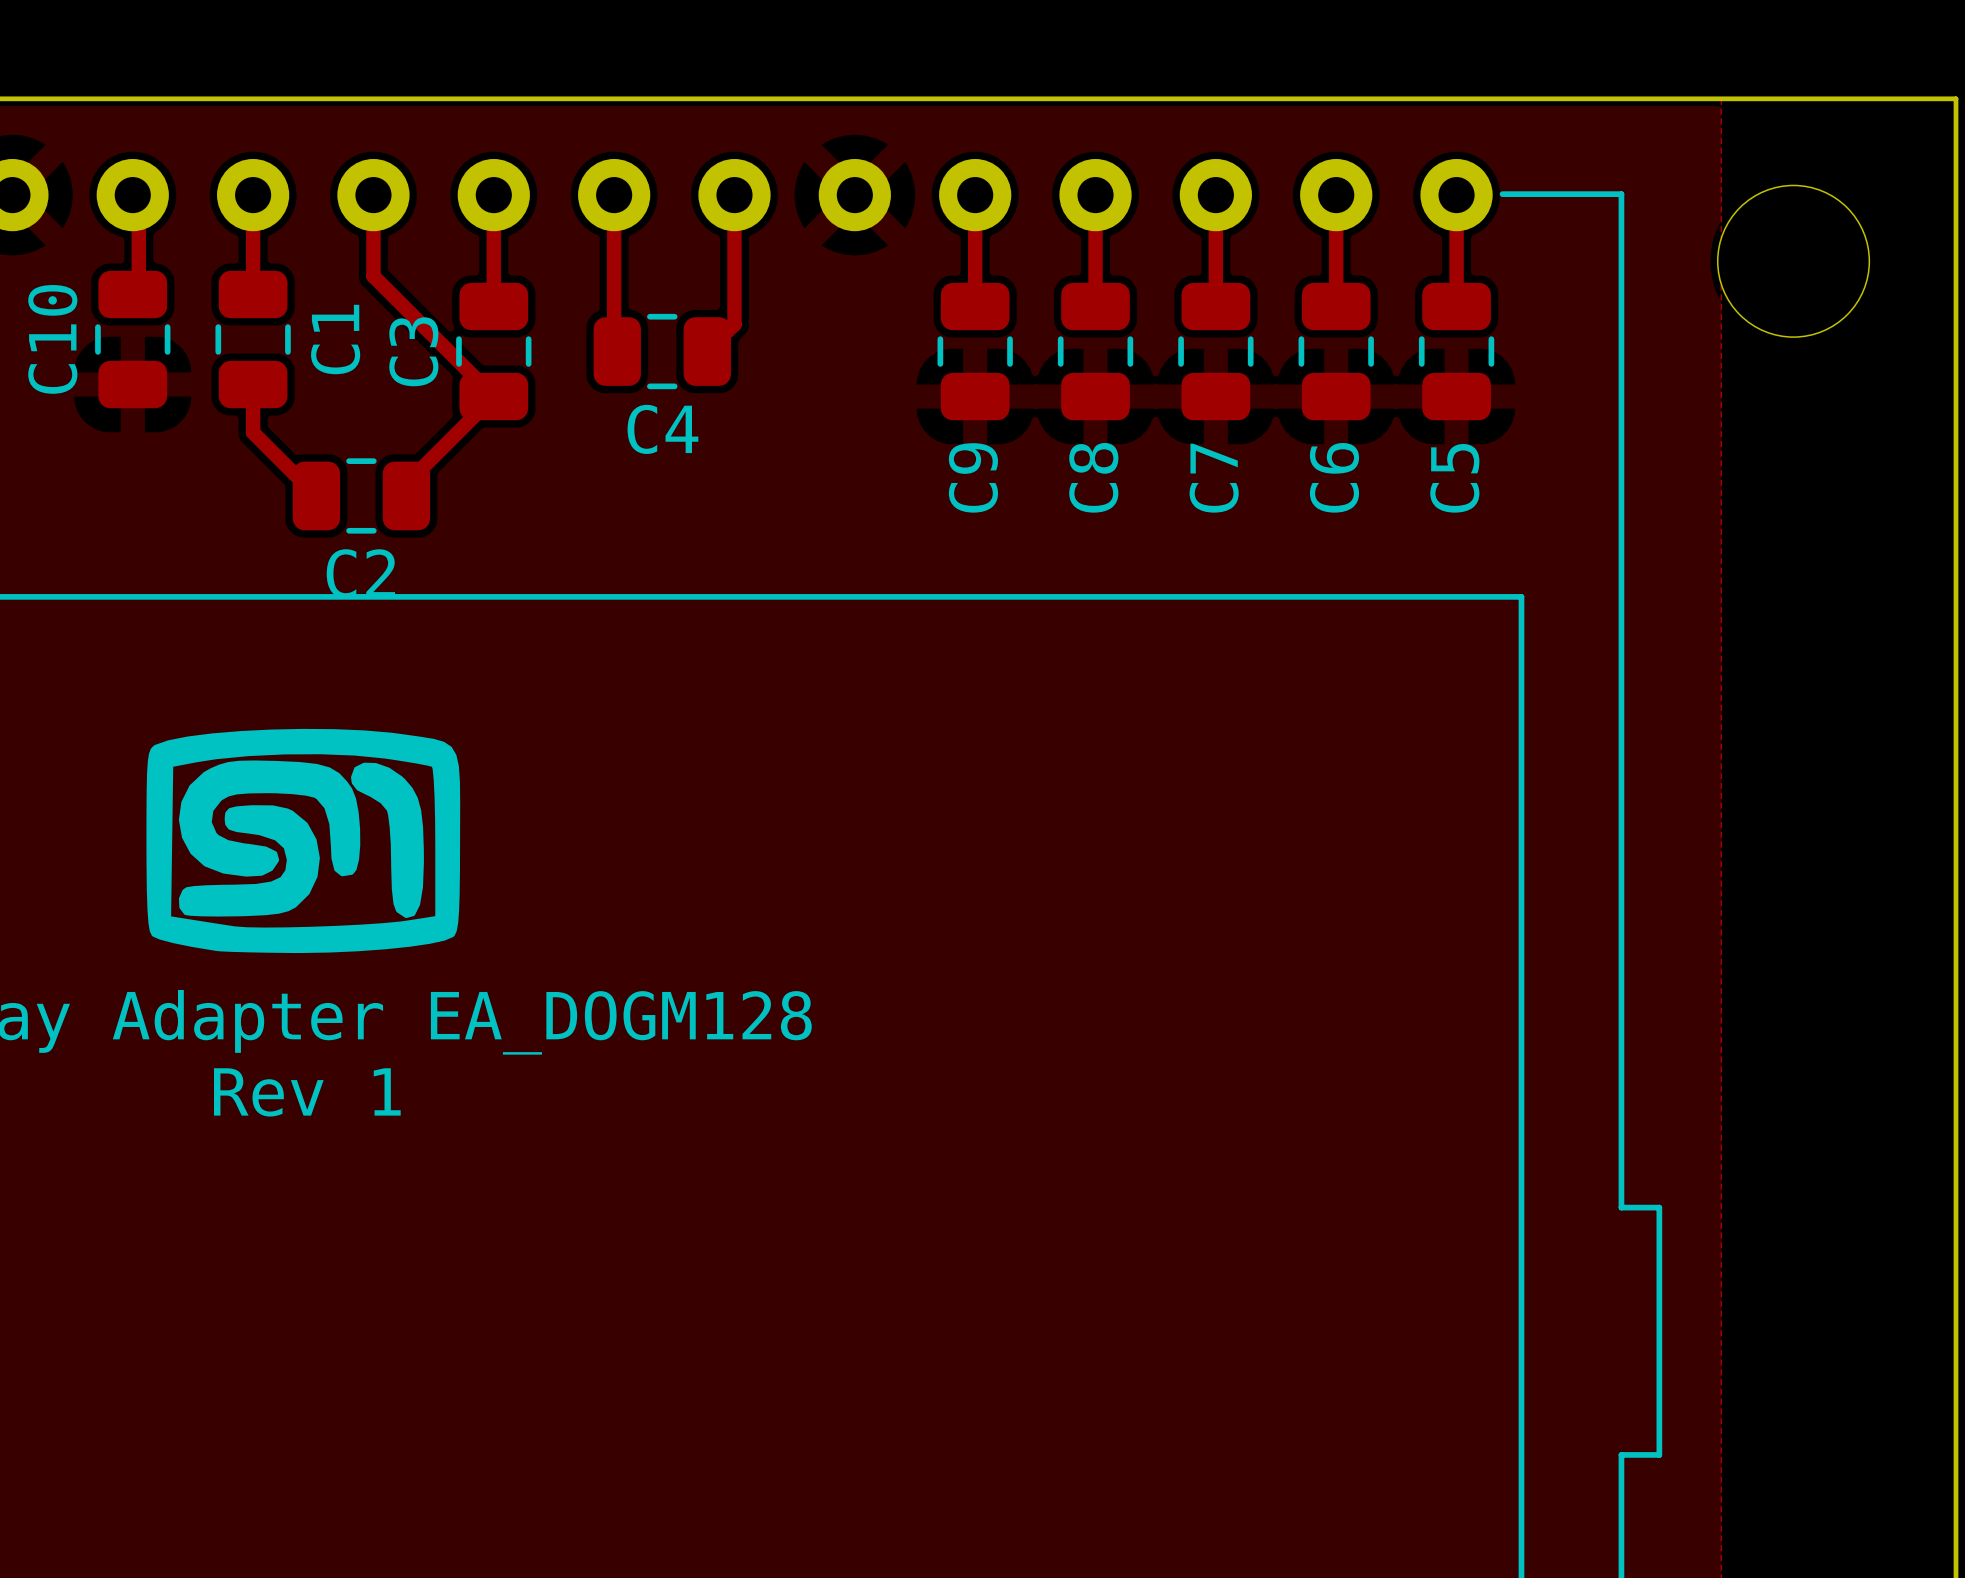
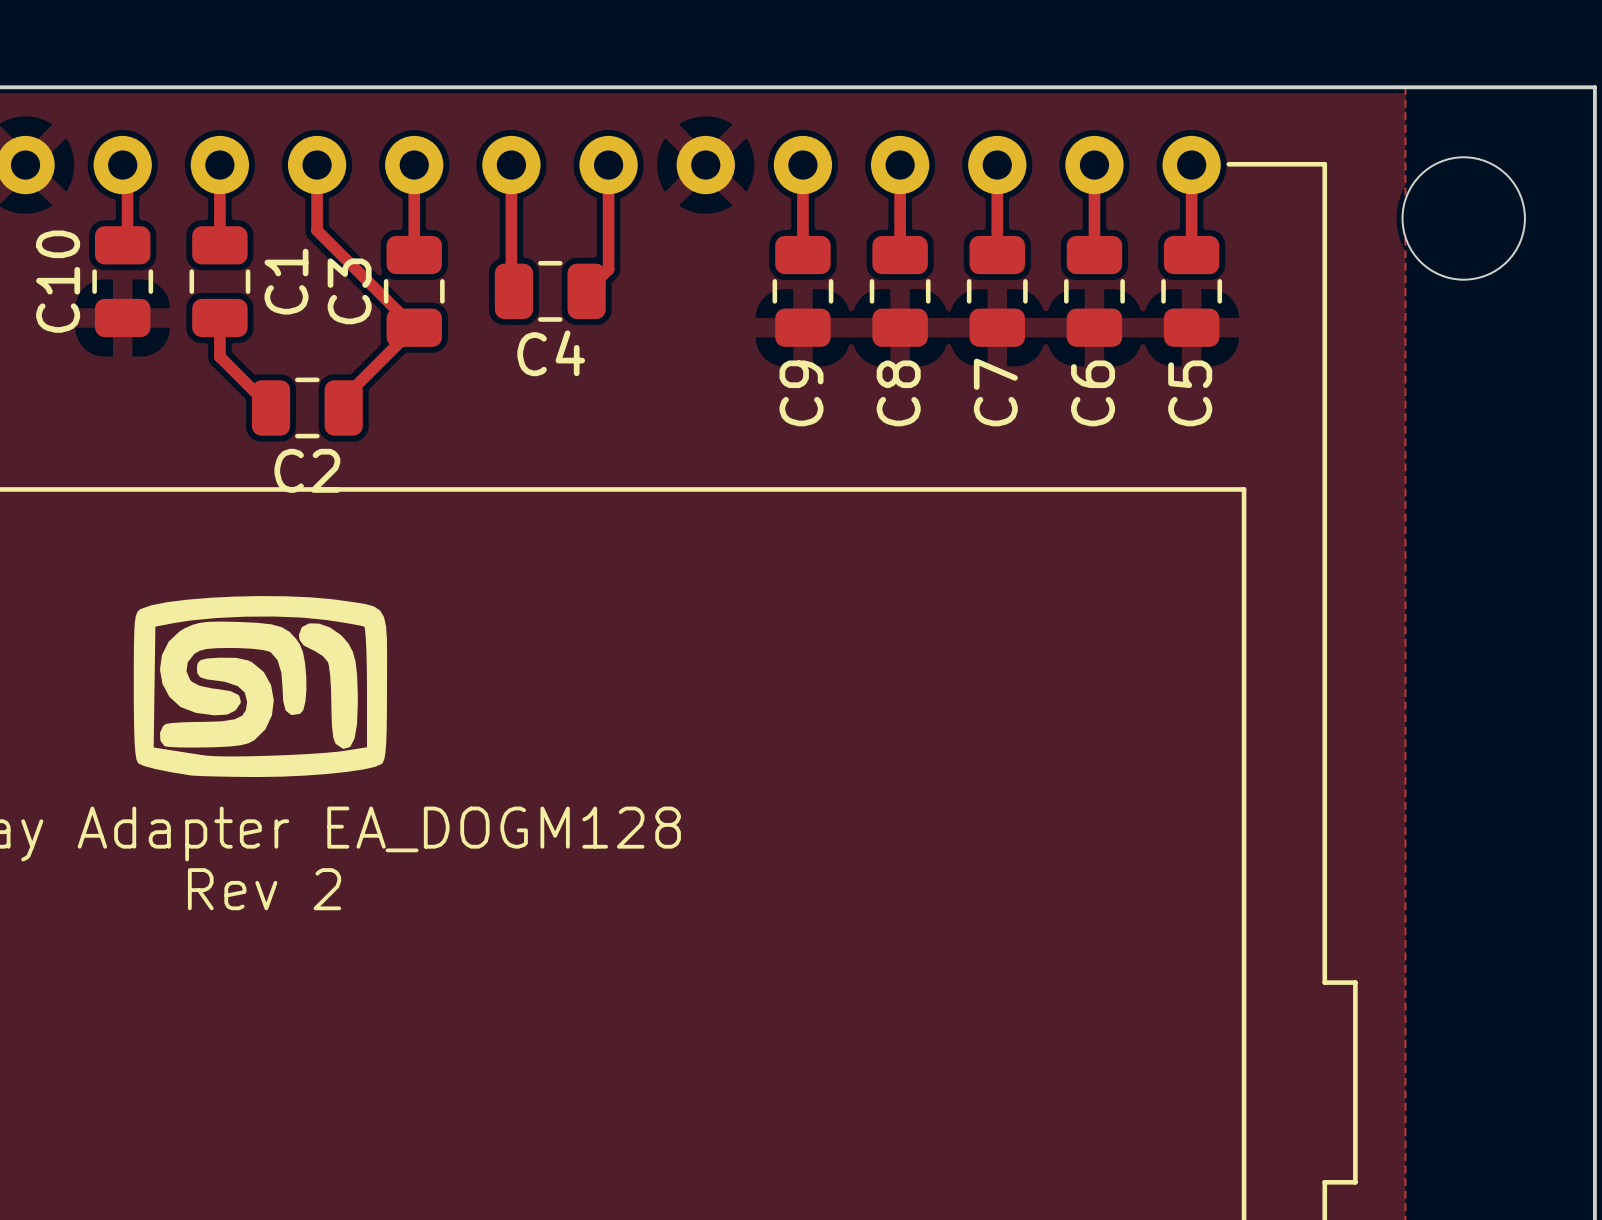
text: Rev 1 (307, 1092) -> Rev 2 (264, 889)

